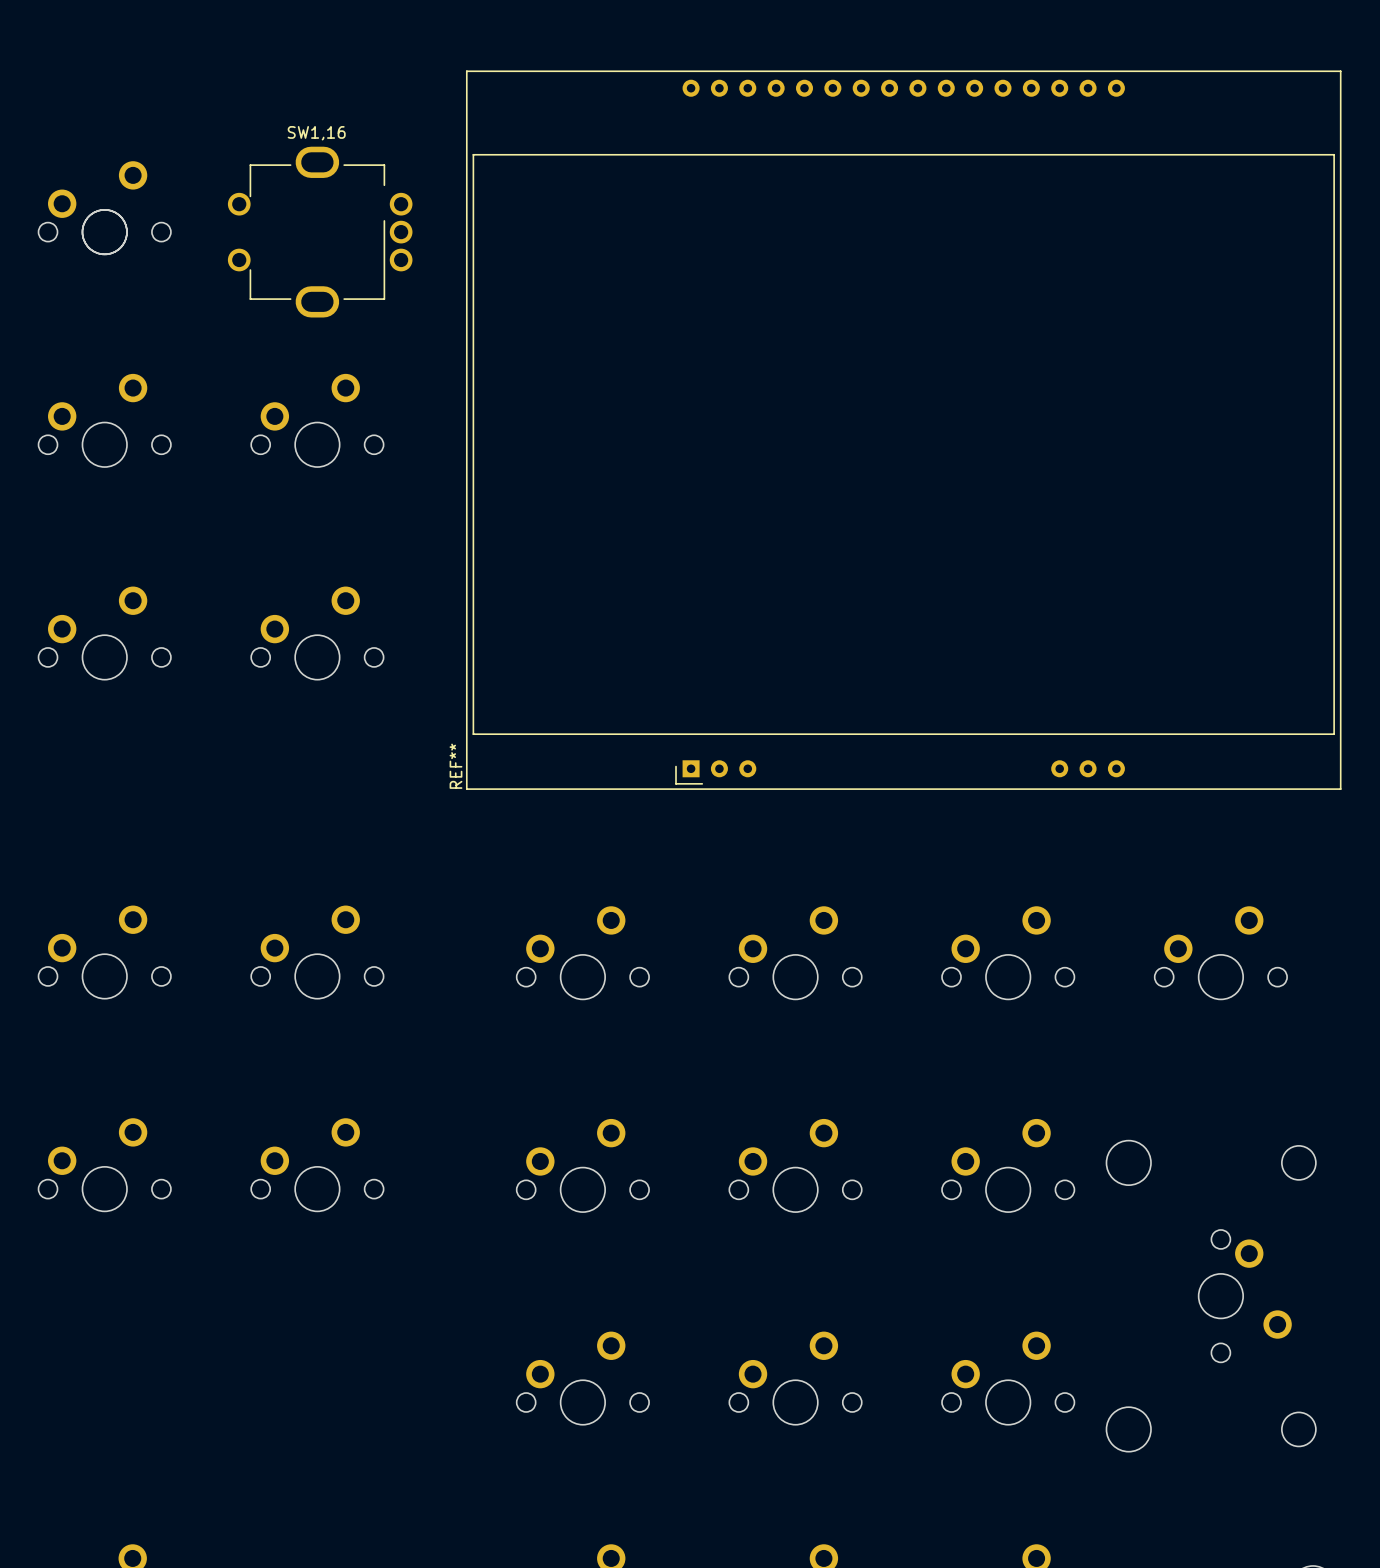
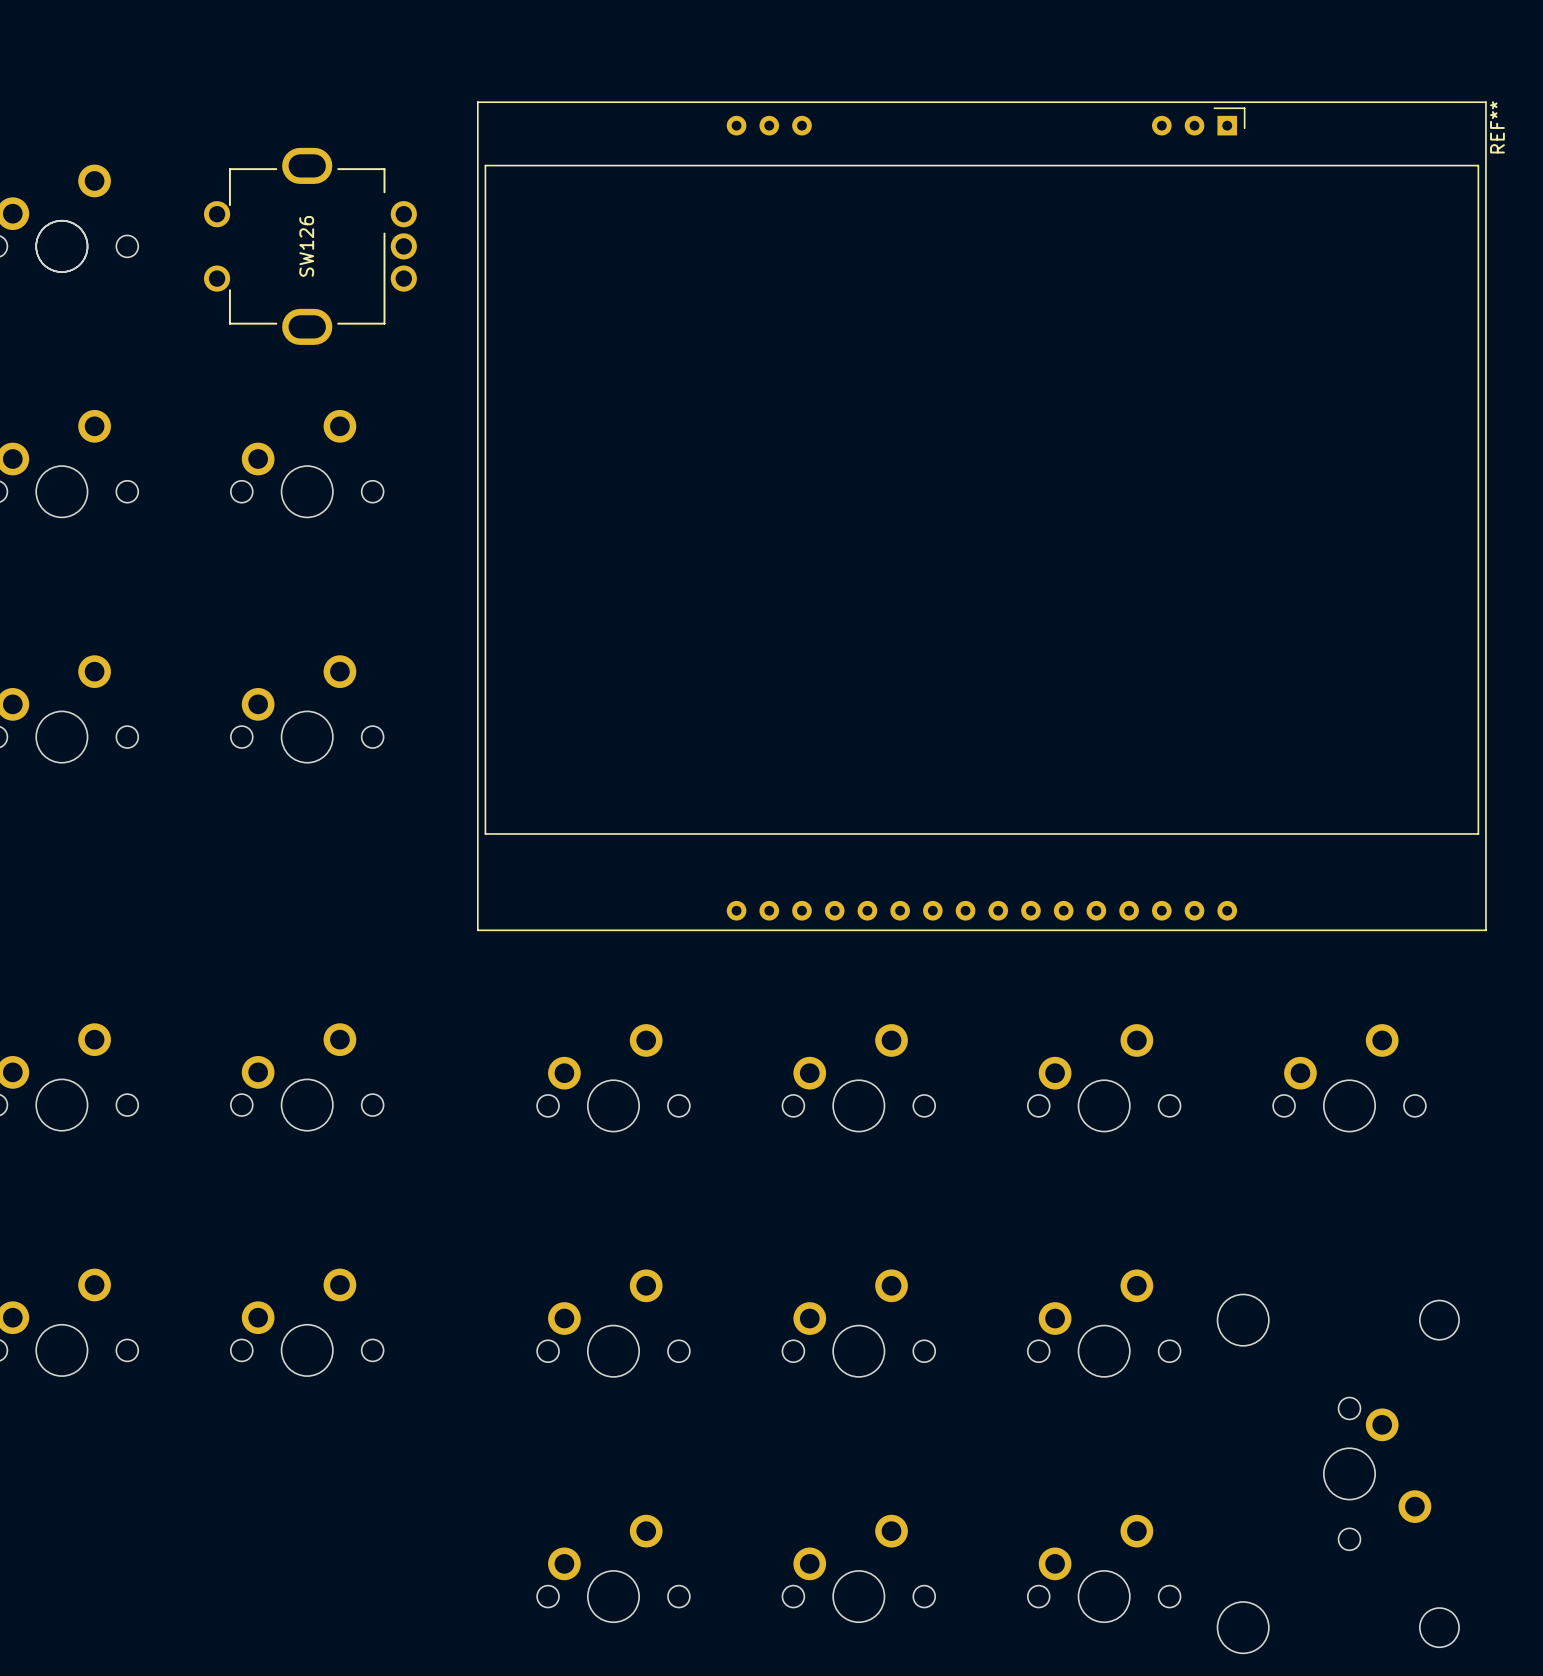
SW1,16 name: SW1,16 (316, 133) -> SW126 (306, 246)
REF** rotation: 0° (903, 430) -> 180° (981, 516)

